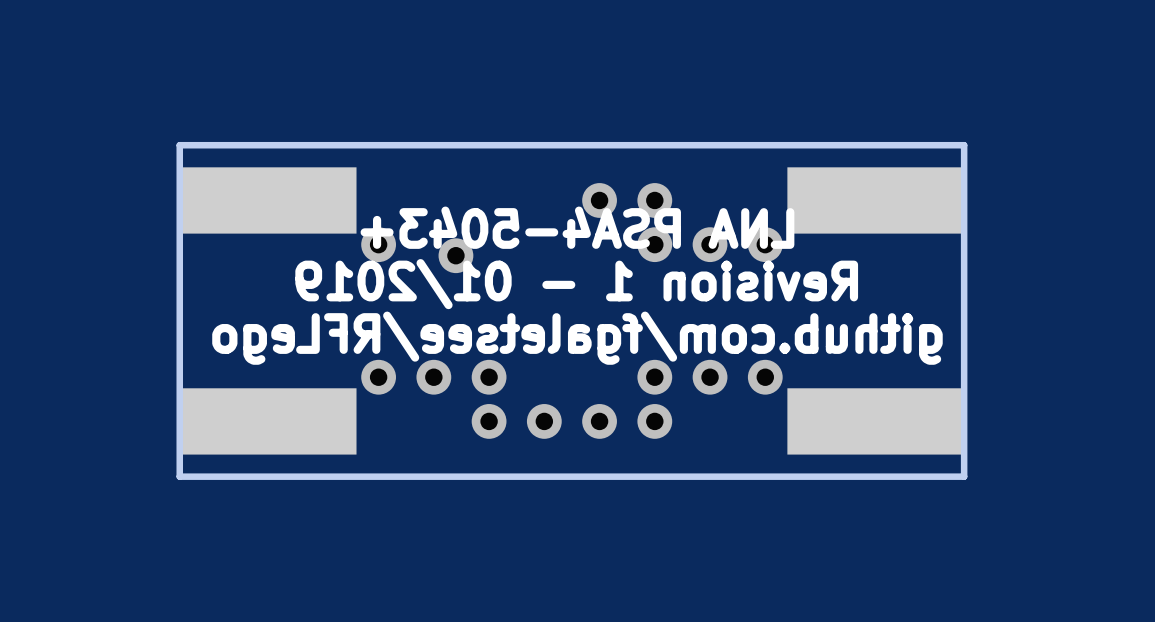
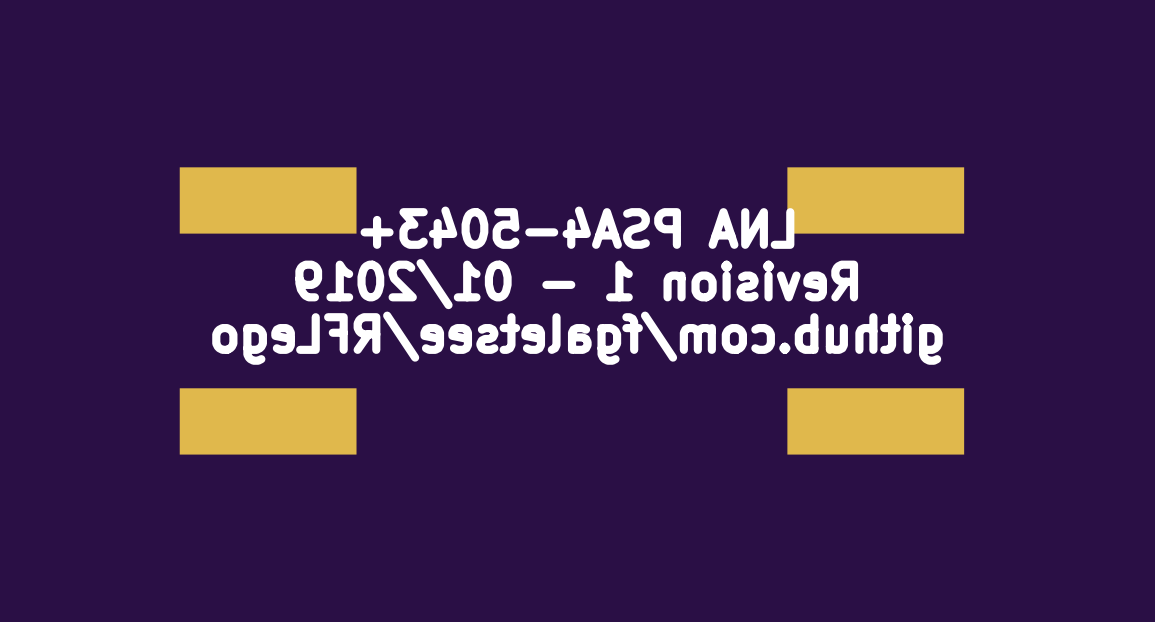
board edge: (964, 145) (964, 476) (179, 476) (179, 145) (964, 145) -> none
via: (599, 200) -> none
via: (654, 200) -> none
via: (378, 244) -> none
via: (654, 244) -> none
via: (710, 244) -> none
via: (765, 244) -> none
via: (455, 255) -> none
via: (378, 377) -> none
via: (433, 377) -> none
via: (489, 377) -> none
via: (654, 377) -> none
via: (710, 377) -> none
via: (765, 377) -> none
via: (489, 421) -> none
via: (544, 421) -> none
via: (599, 421) -> none
via: (654, 421) -> none

